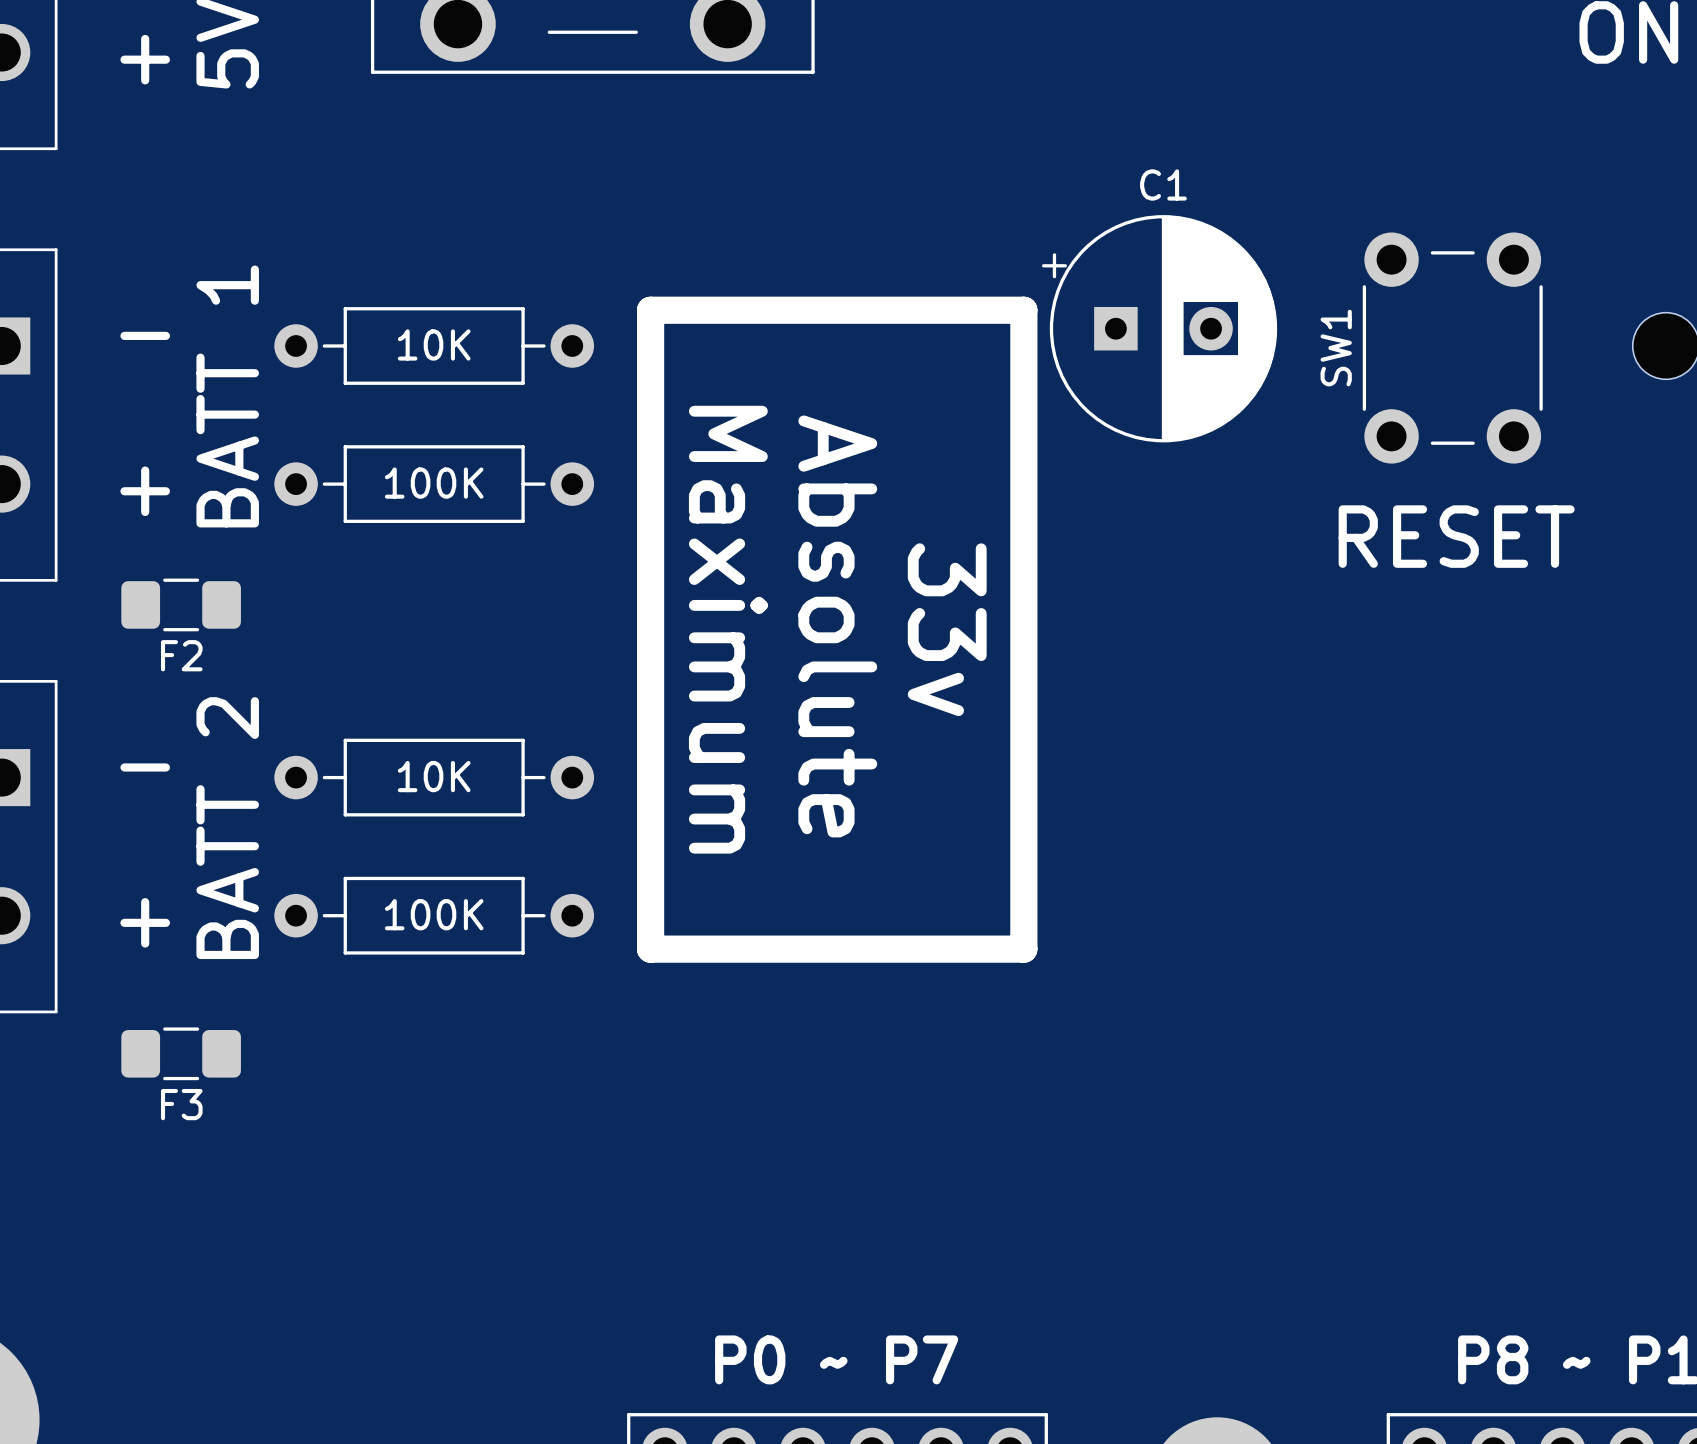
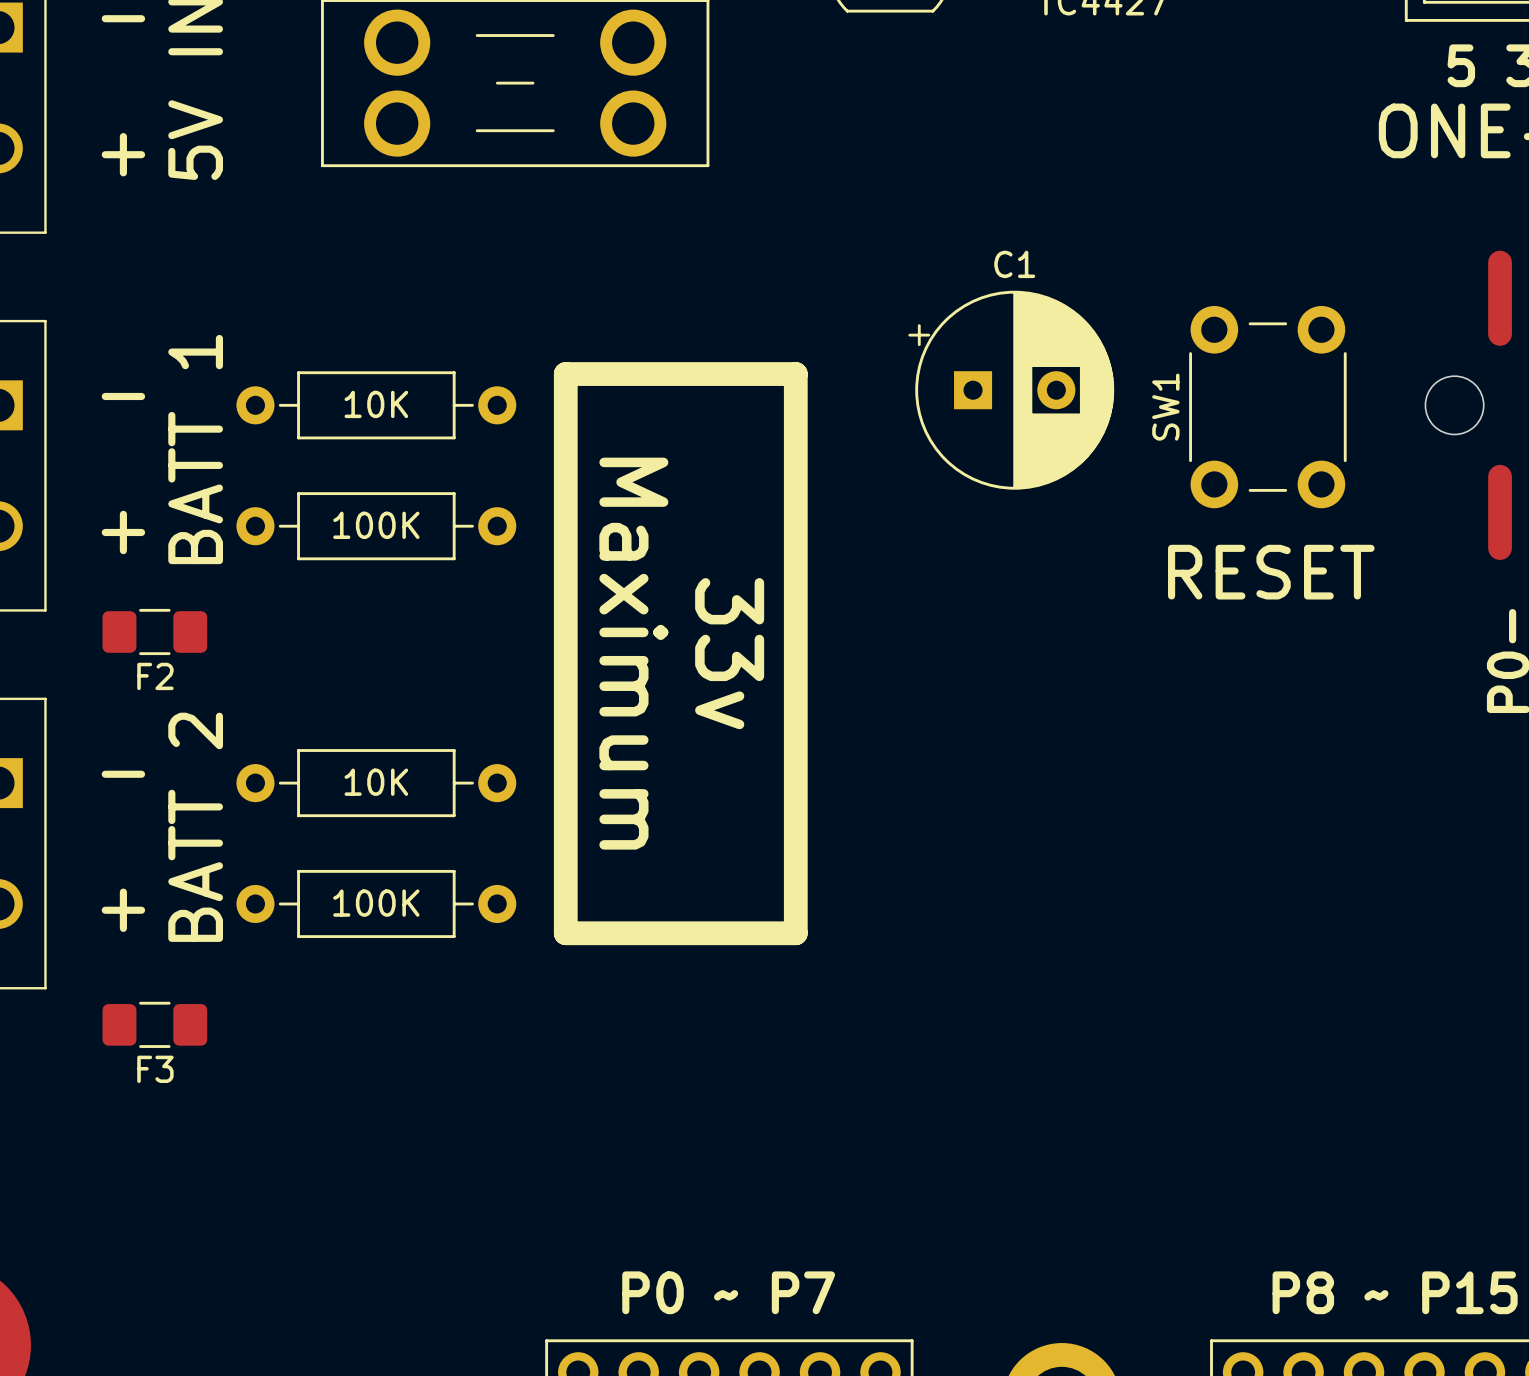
line: (913, 310) (1023, 310) (1023, 949) (913, 949) -> (795, 374) (795, 933)
text: Absolute (837, 626) -> 33v (729, 653)
text: 33v (947, 629) -> none

